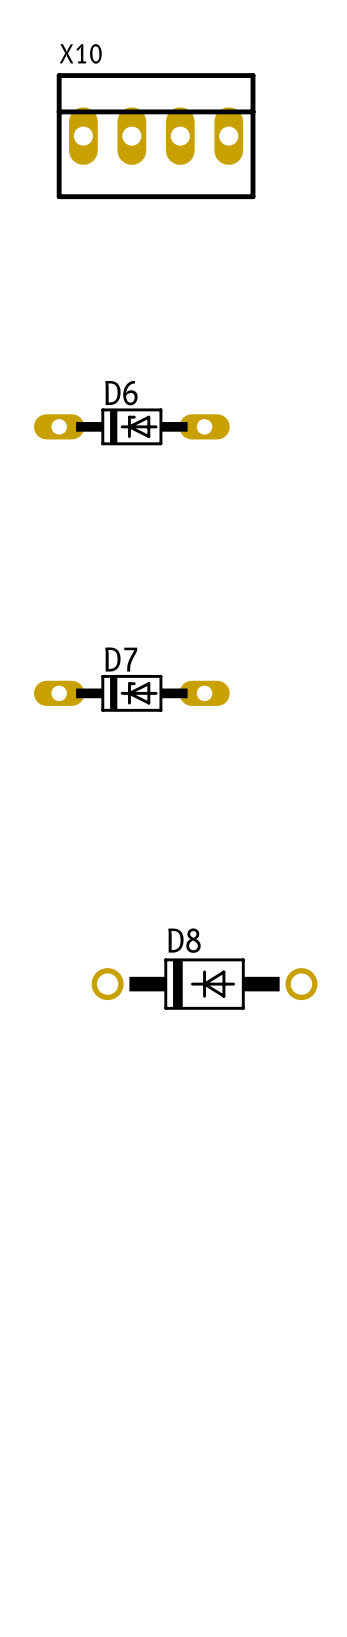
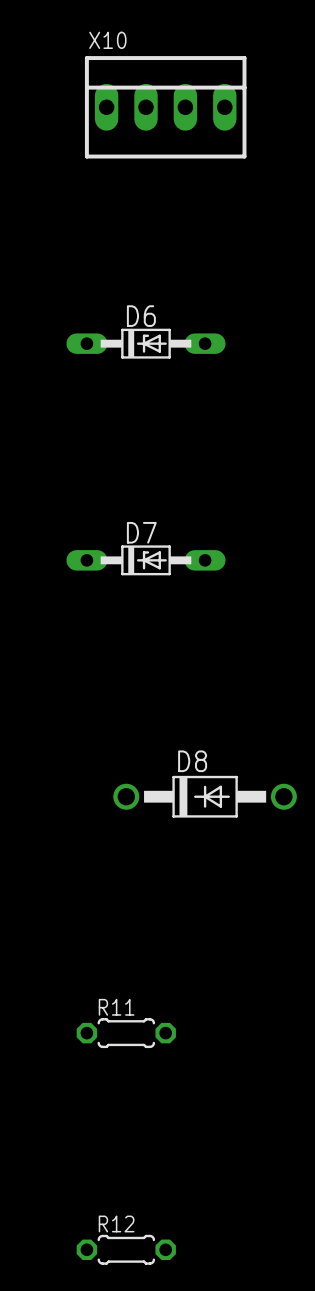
R11: none -> (126, 1033)
R12: none -> (126, 1249)

